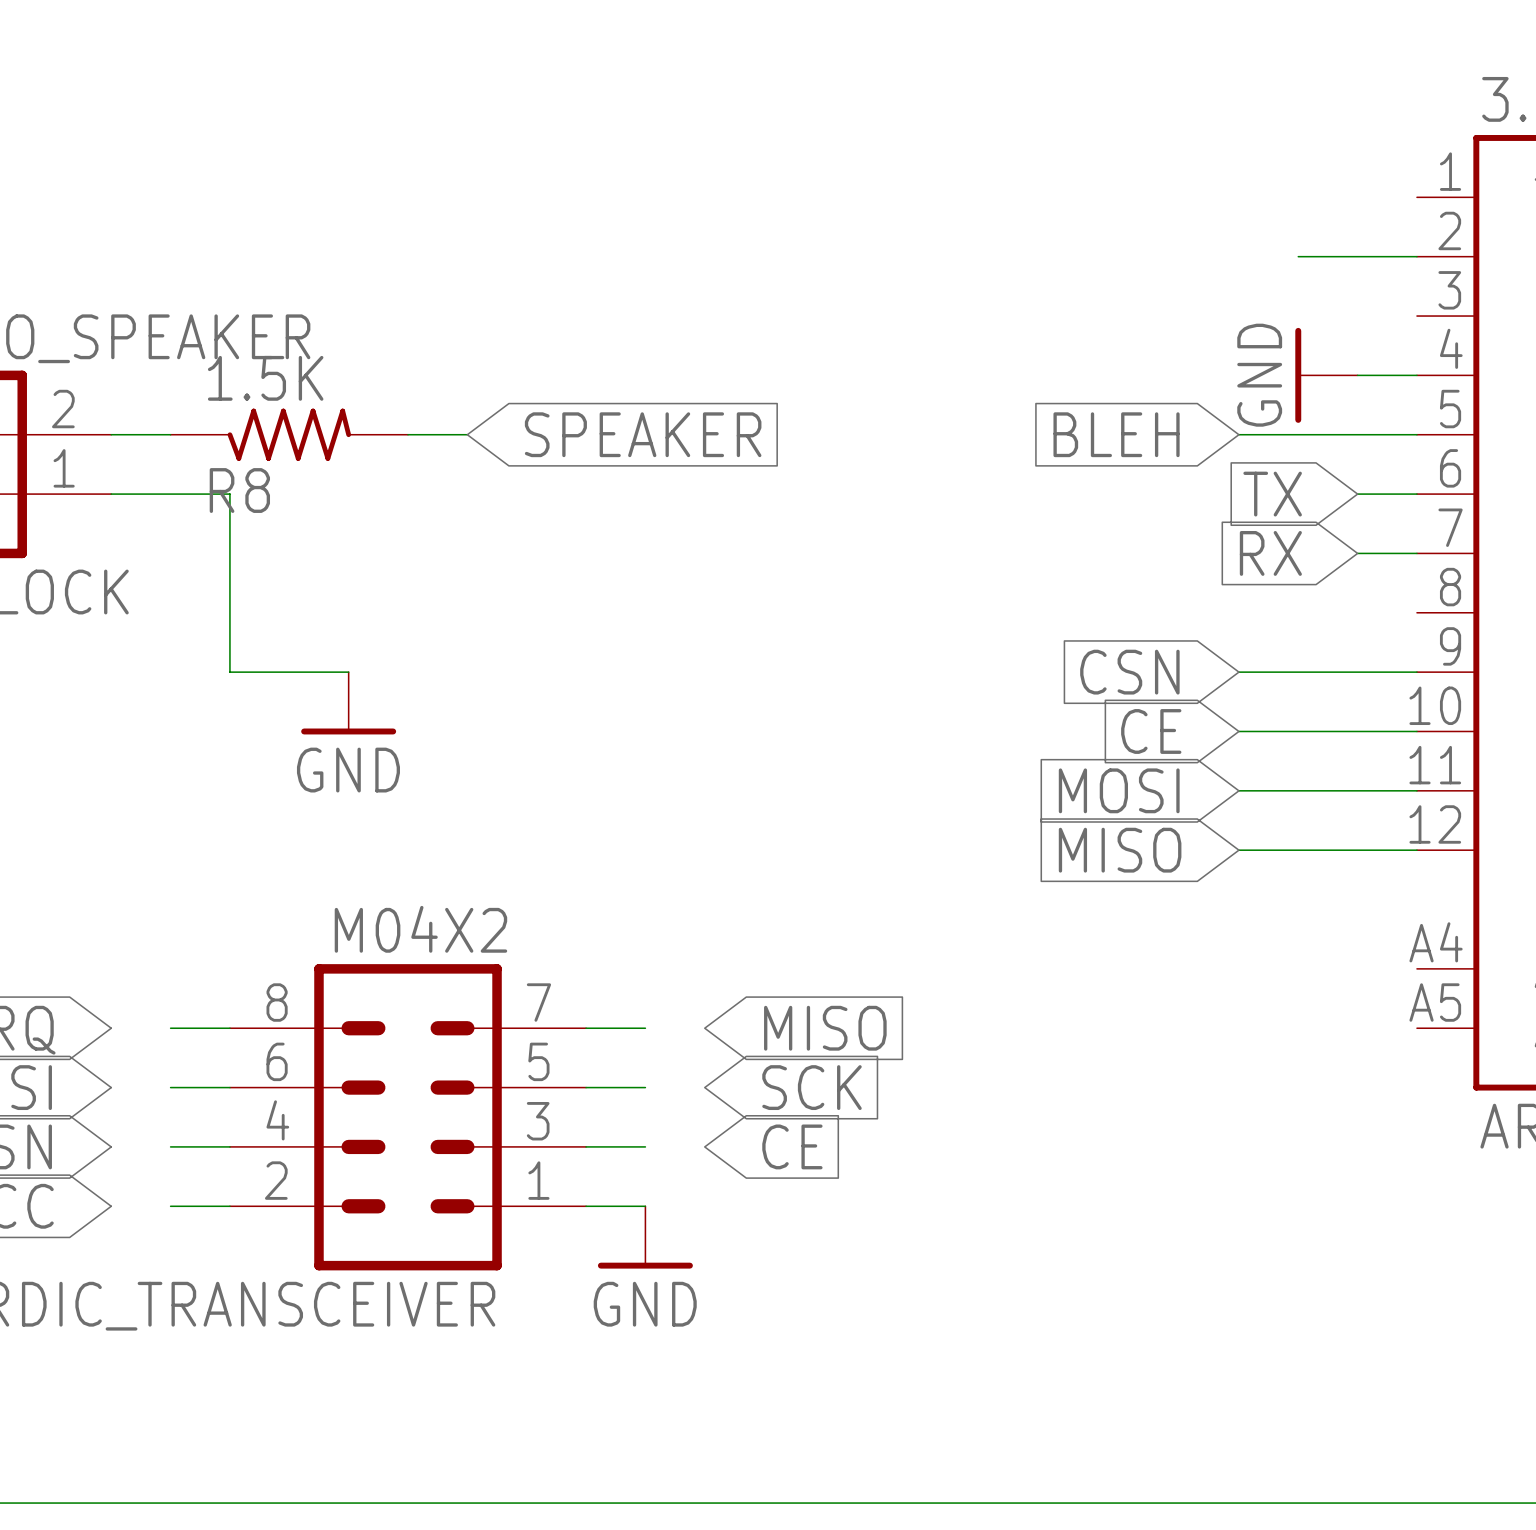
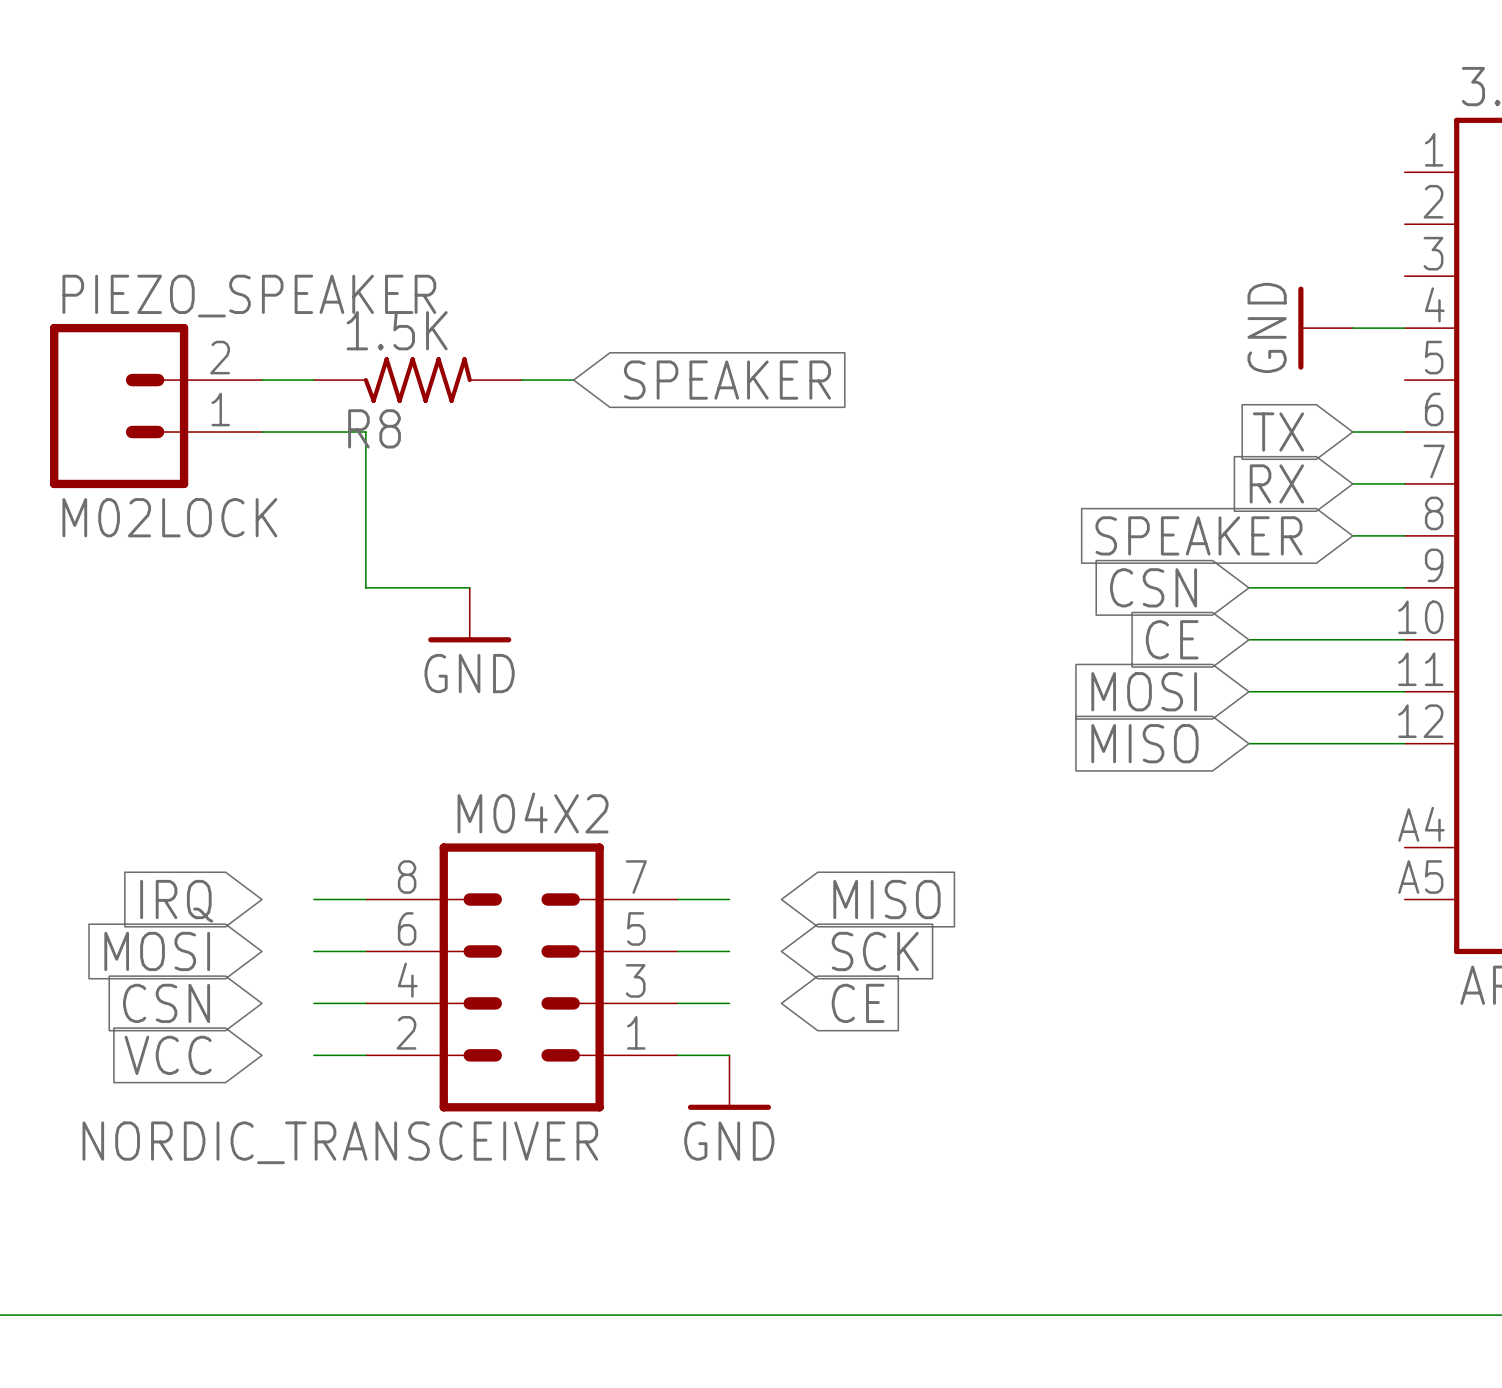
wire: (1298, 256) (1416, 256) -> none
global label: BLEH (1116, 434) -> none
wire: (1238, 434) (1416, 434) -> none
global label: none -> SPEAKER (1198, 535)
wire: none -> (1352, 535) (1404, 535)

